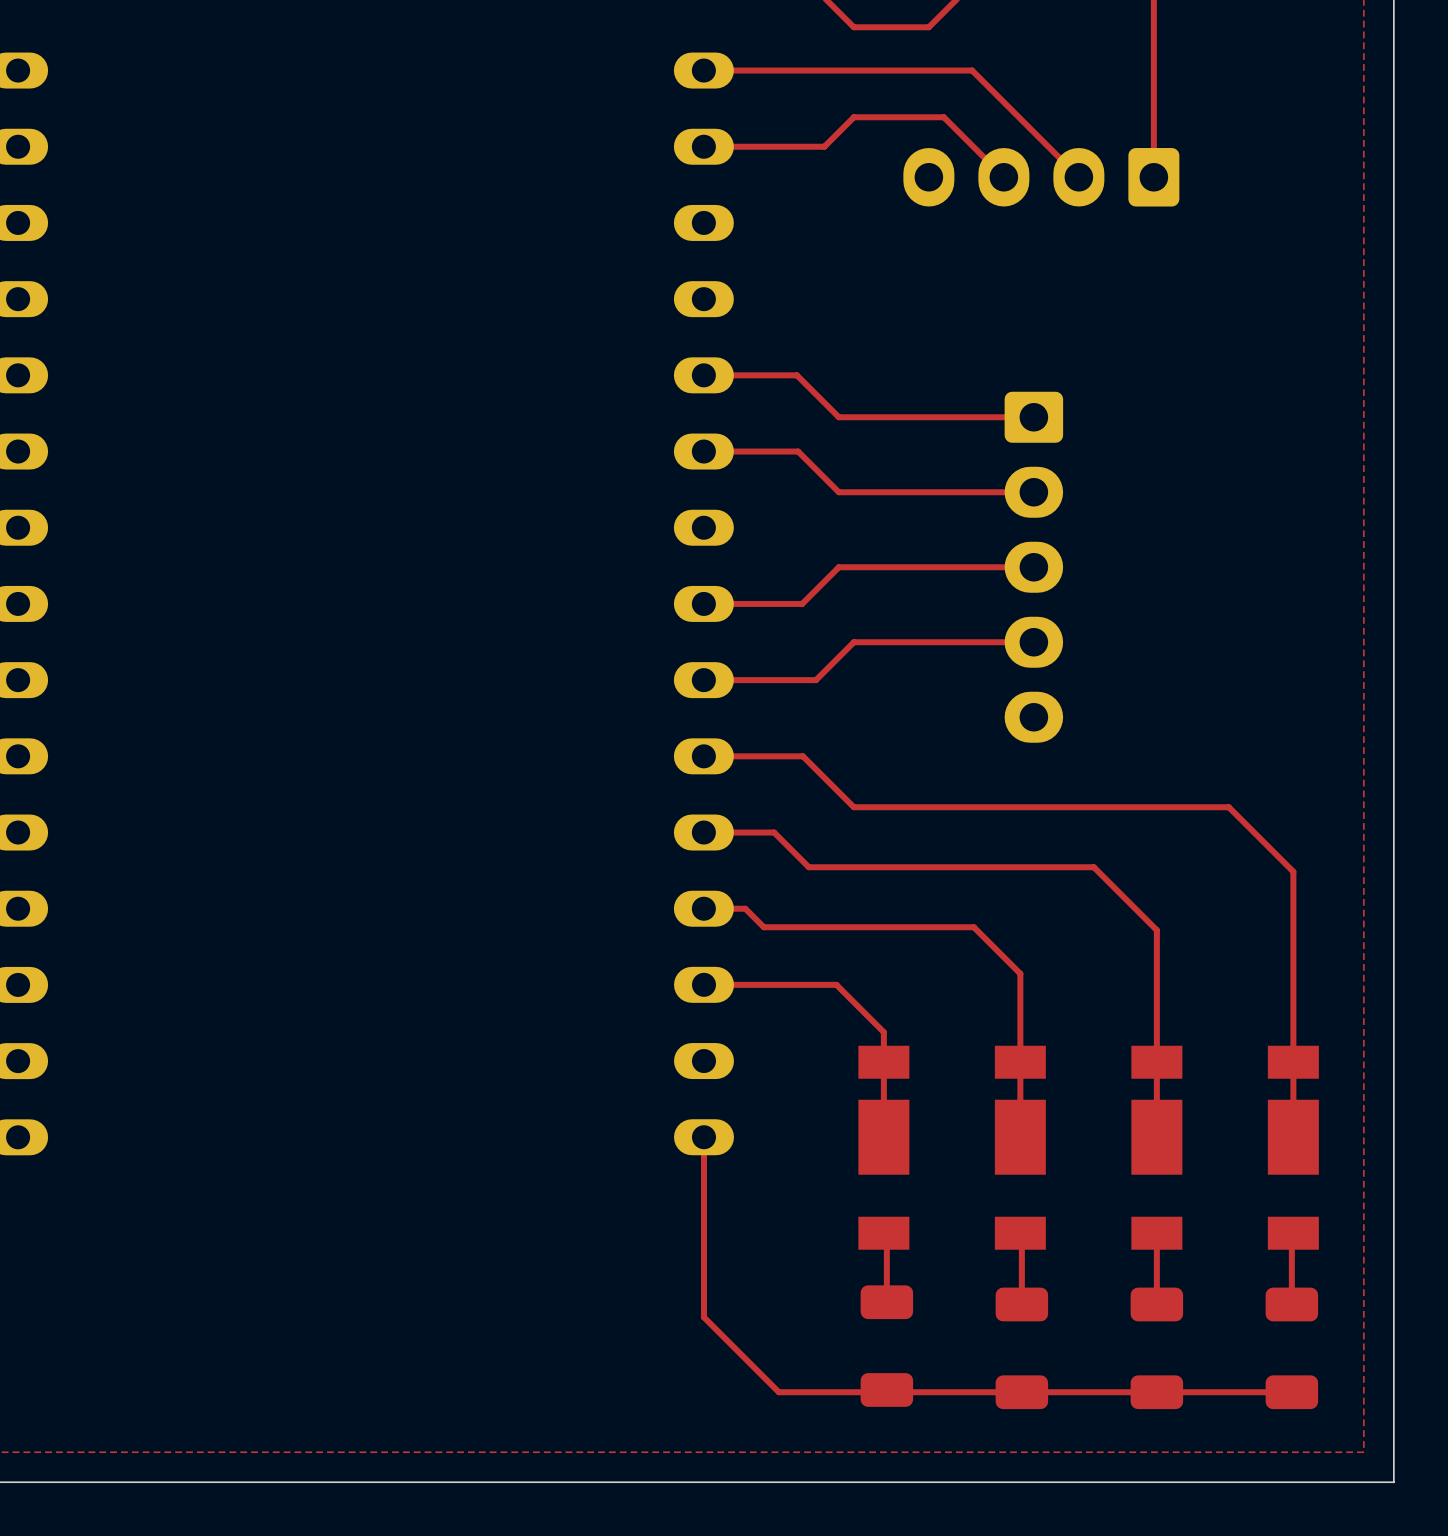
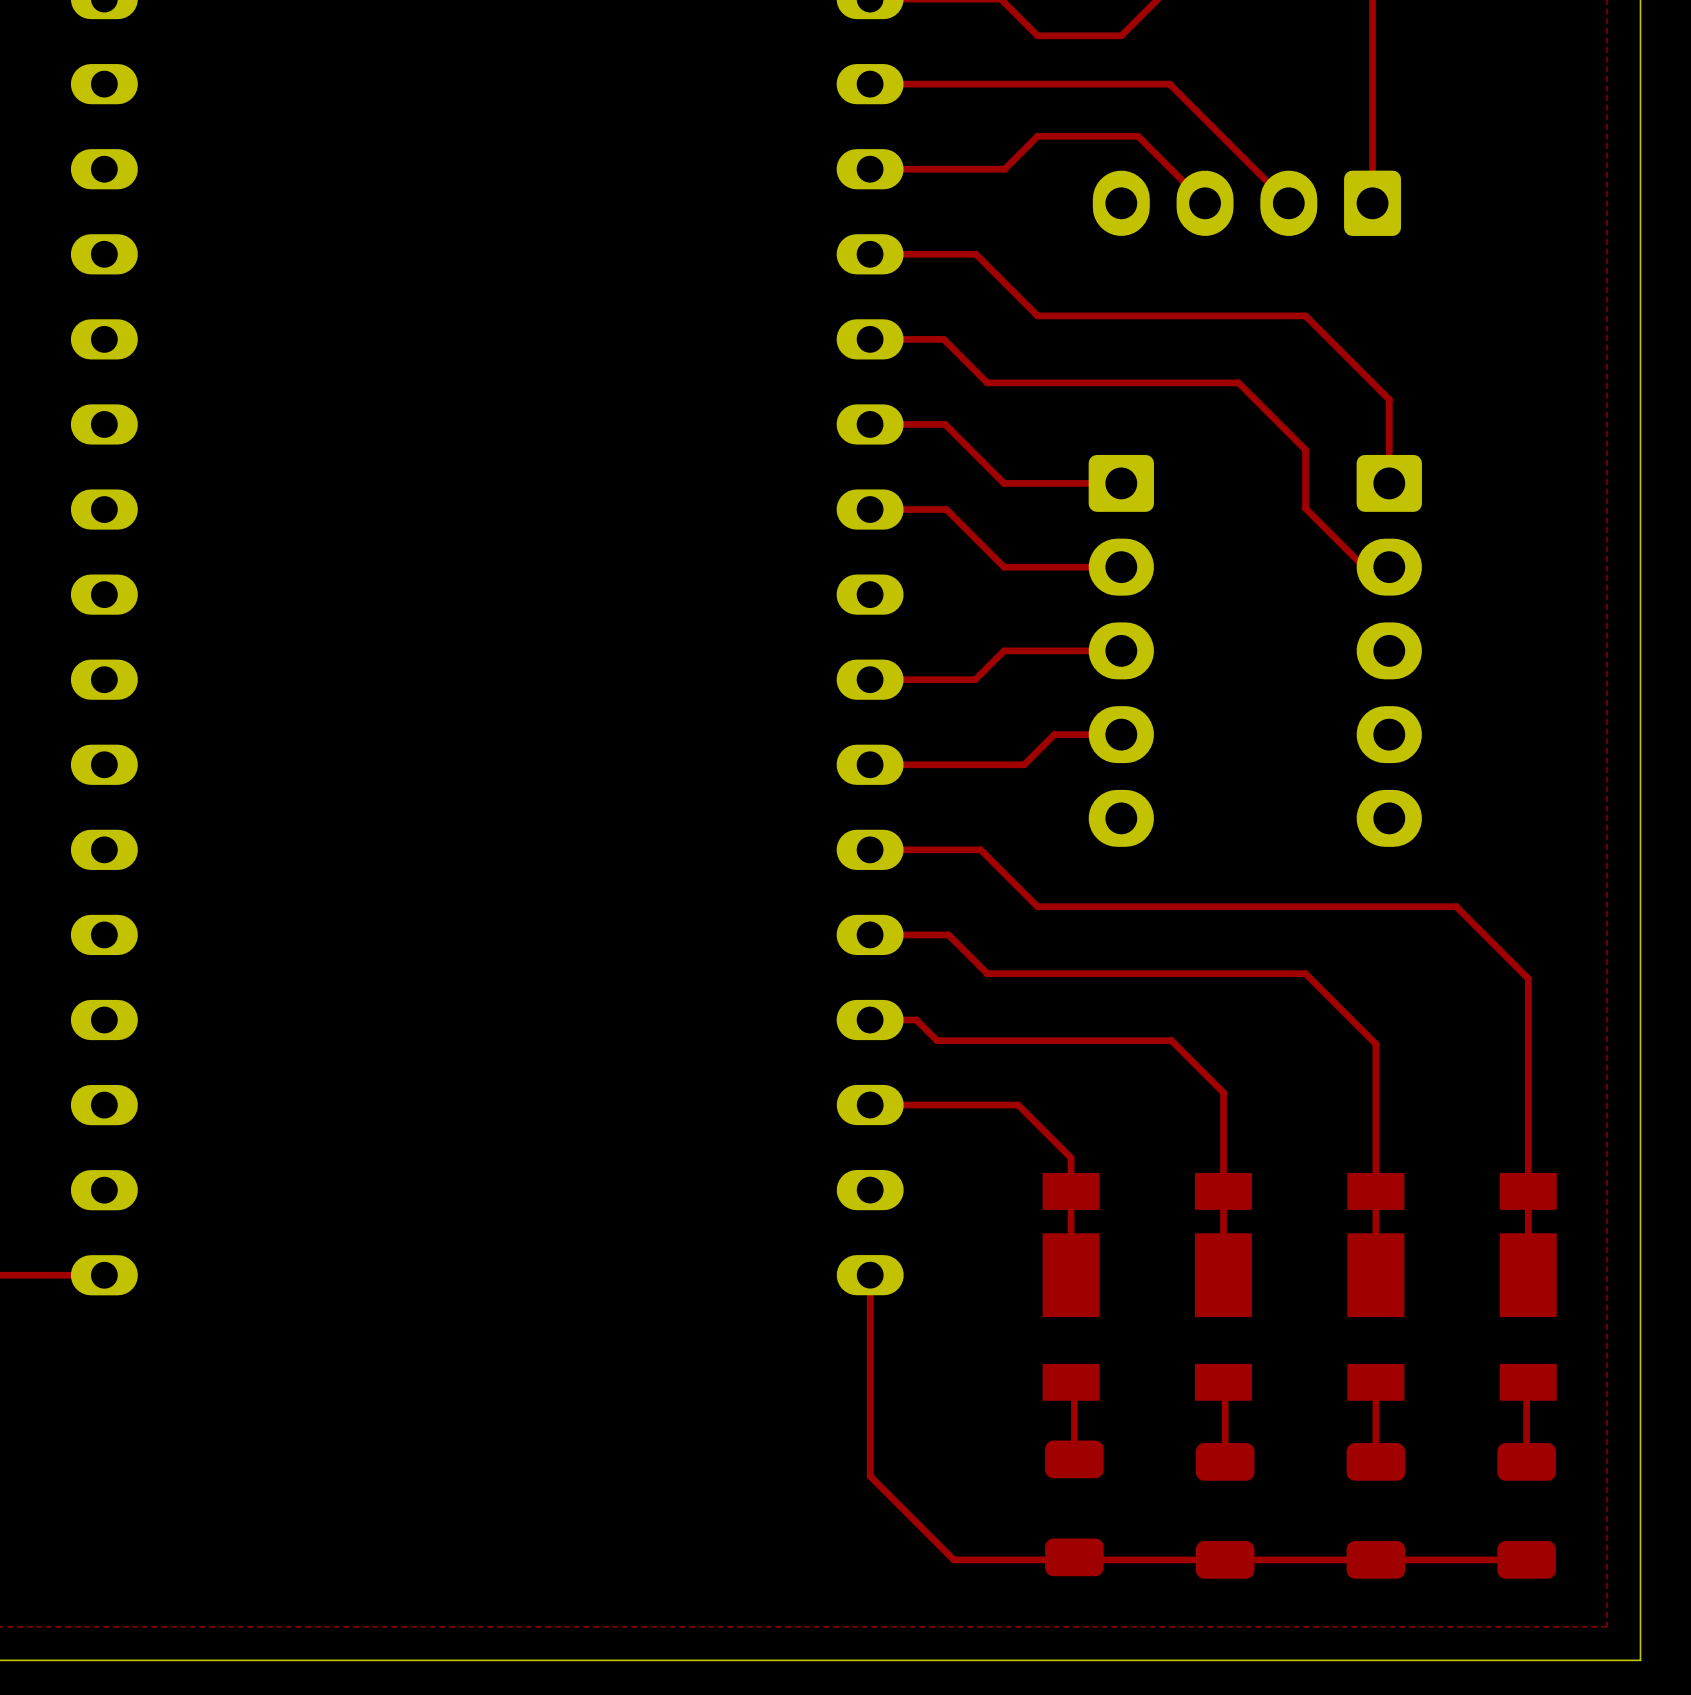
top track: none -> (870, 254) (975, 254) (1037, 315) (1305, 315) (1389, 399) (1389, 483)
top track: none -> (870, 339) (943, 339) (987, 382) (1238, 382) (1305, 449) (1305, 508) (1364, 567) (1389, 567)
top track: (771, 375) (796, 375) (838, 417) (1033, 417) -> (945, 424) (1004, 483) (1121, 483)
top track: (772, 451) (798, 451) (838, 492) (1033, 492) -> (946, 509) (1004, 567) (1121, 567)
top track: (1033, 567) (838, 567) (802, 603) (798, 603) -> (1121, 650) (1004, 650) (975, 679)
part: (1033, 567) -> none
part: none -> (1121, 650)
part: none -> (1389, 650)
top track: (1033, 642) (853, 642) (815, 680) -> (1121, 734) (1054, 734) (1024, 764) (995, 764)

